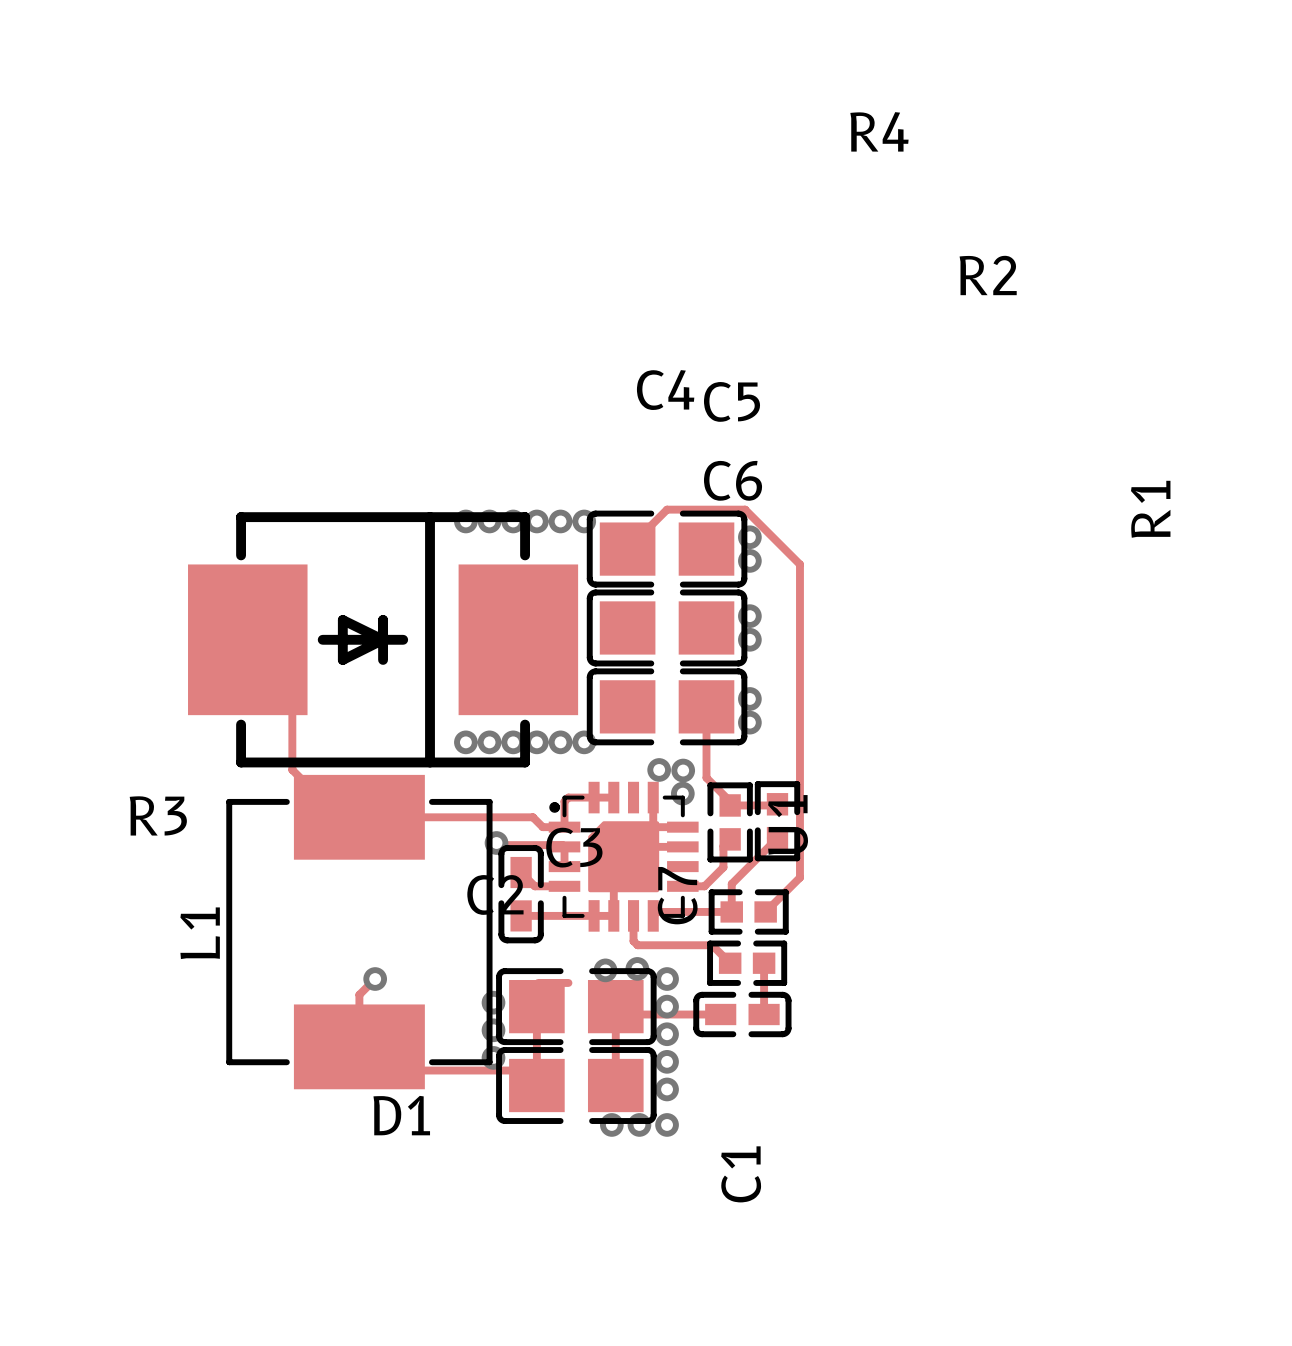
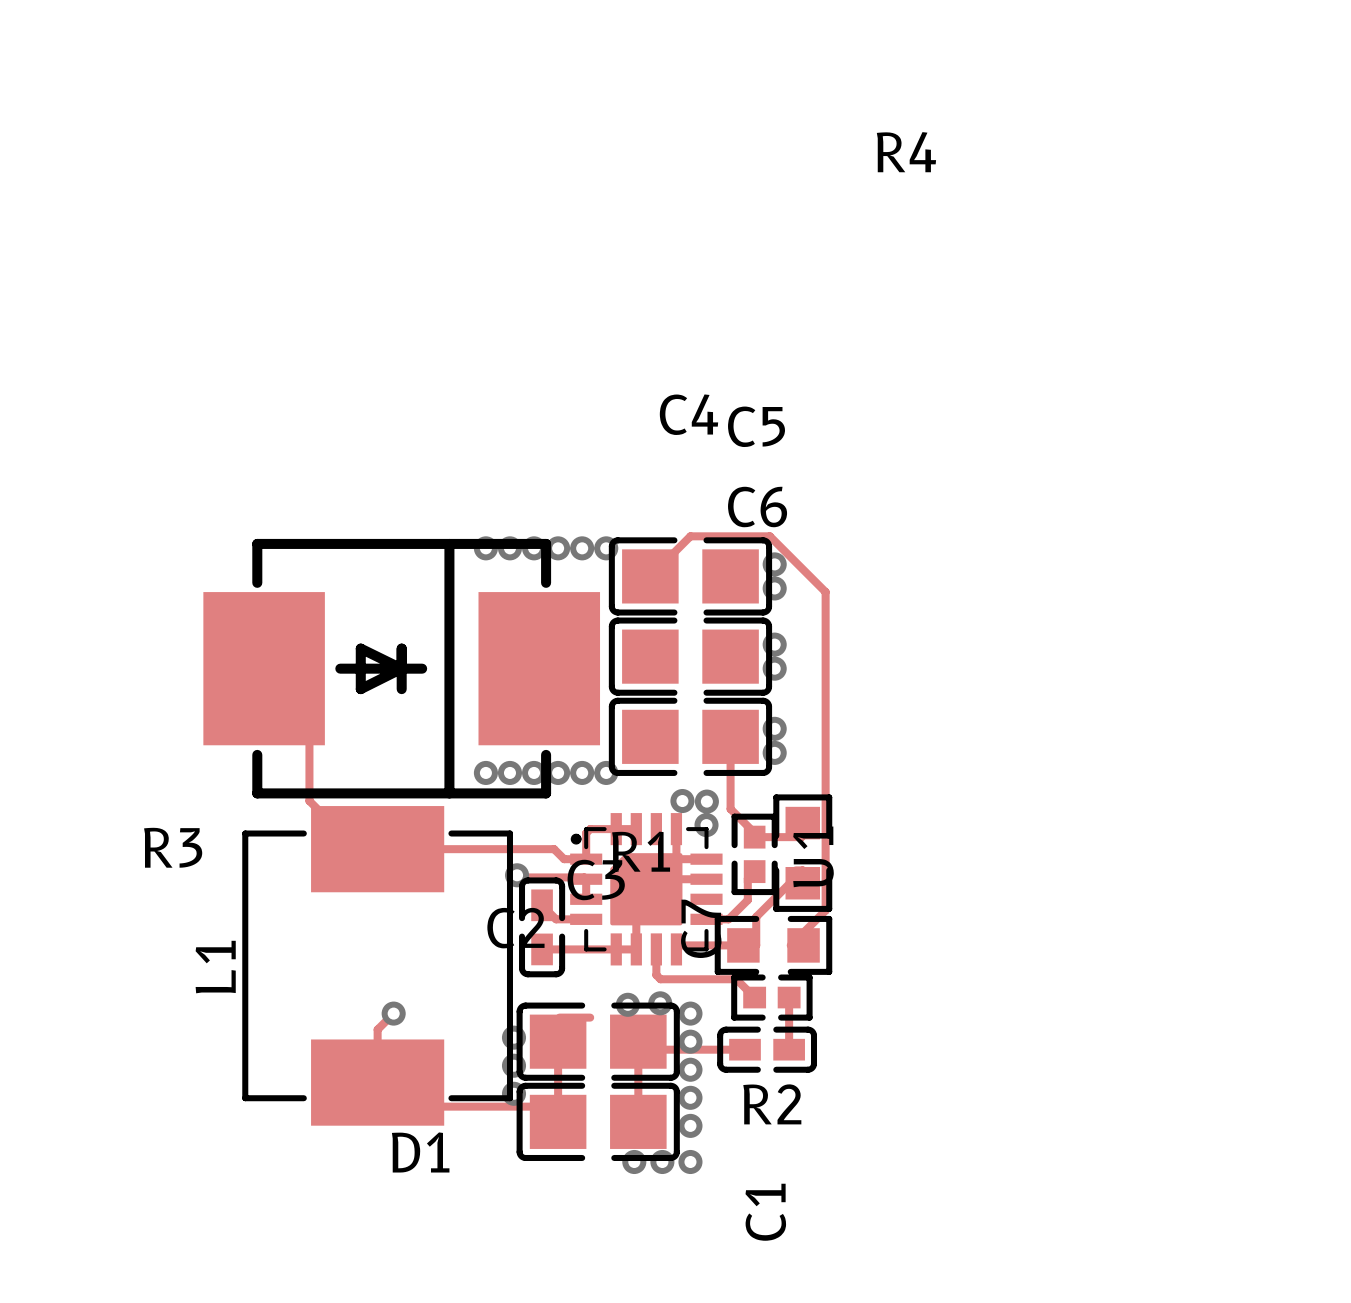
R2 name position: R2 (988, 275) -> R2 (772, 1104)
R1 name rotation: 0° (1150, 509) -> 90° clockwise (641, 851)
R1 name position: R1 (1150, 509) -> R1 (641, 851)
R1 footprint: [754, 781, 801, 862] -> [773, 794, 833, 912]
R2 footprint: [708, 889, 789, 935] -> [714, 915, 833, 975]

